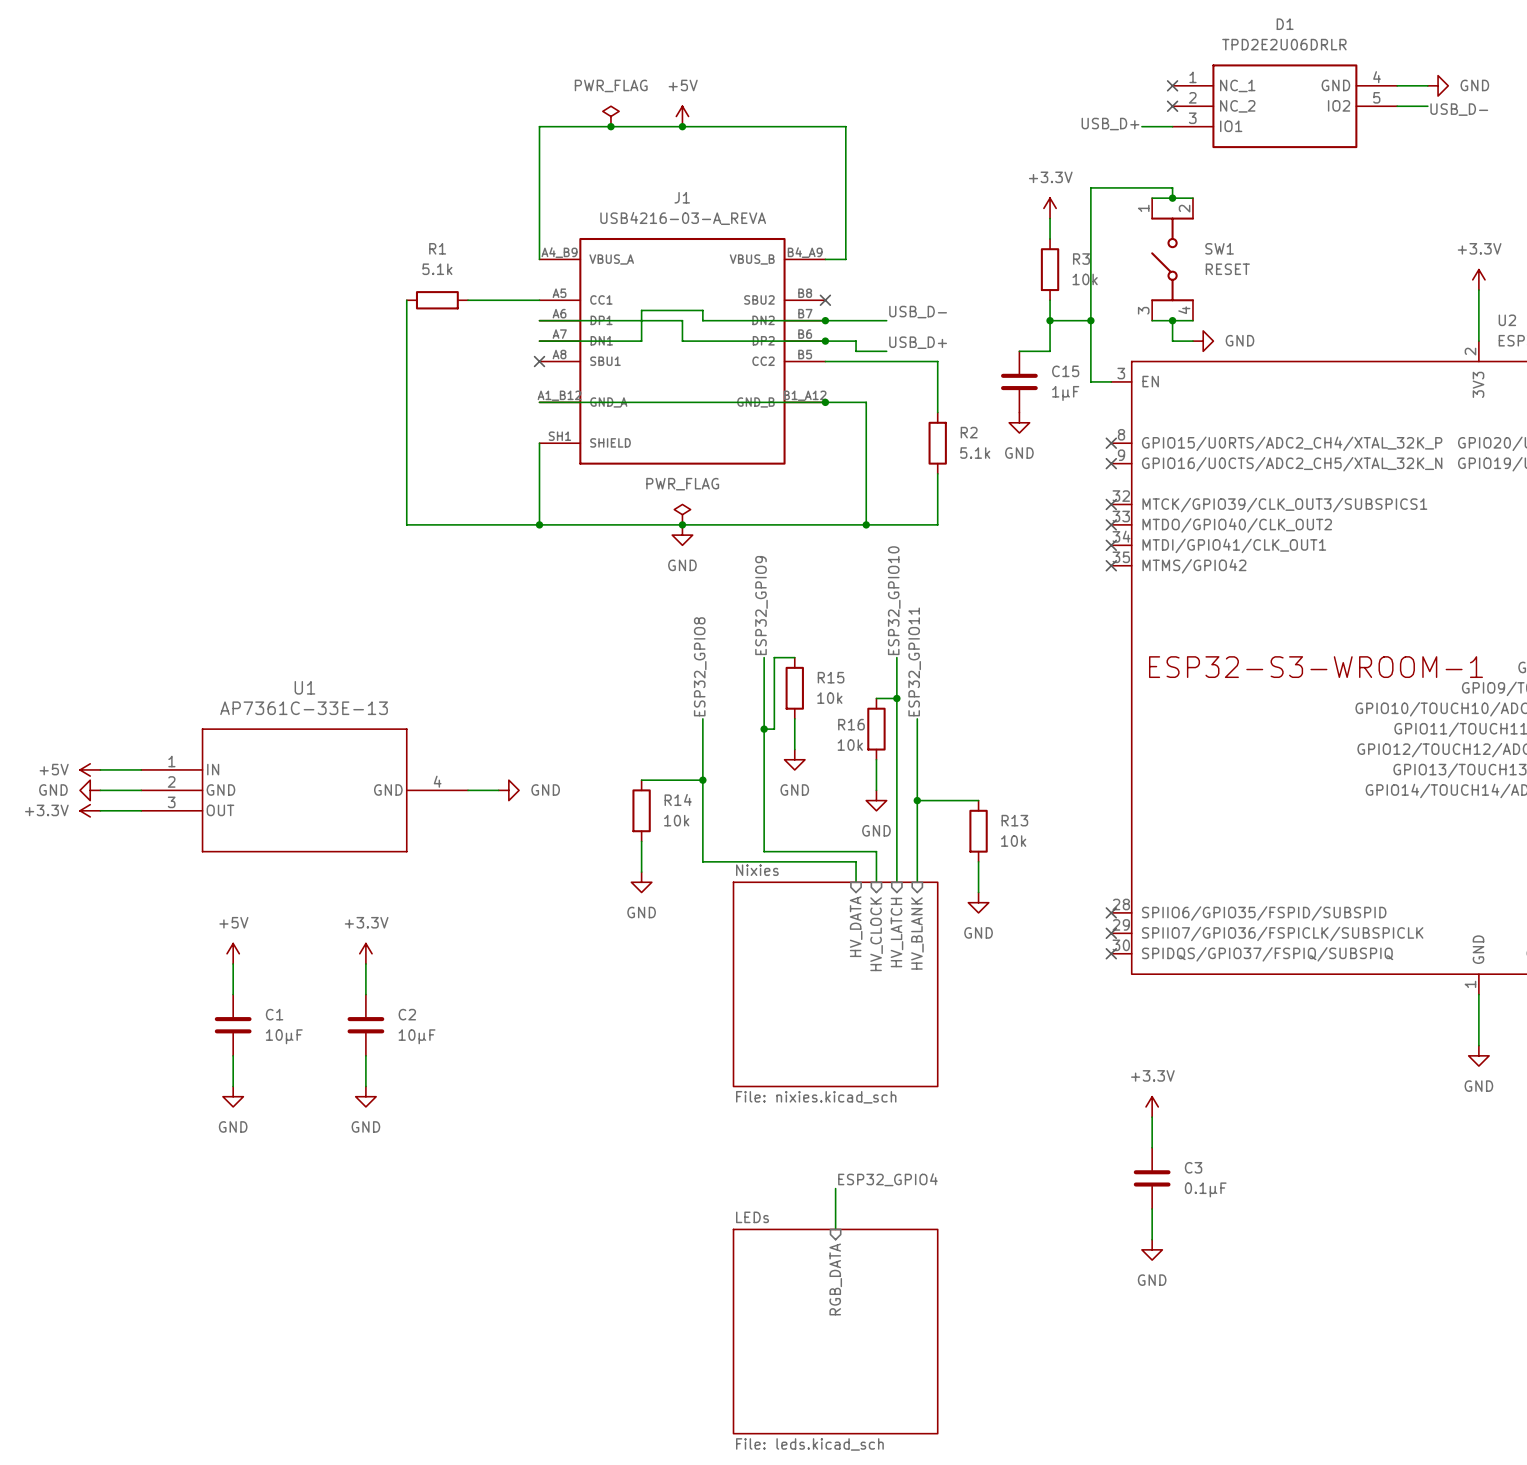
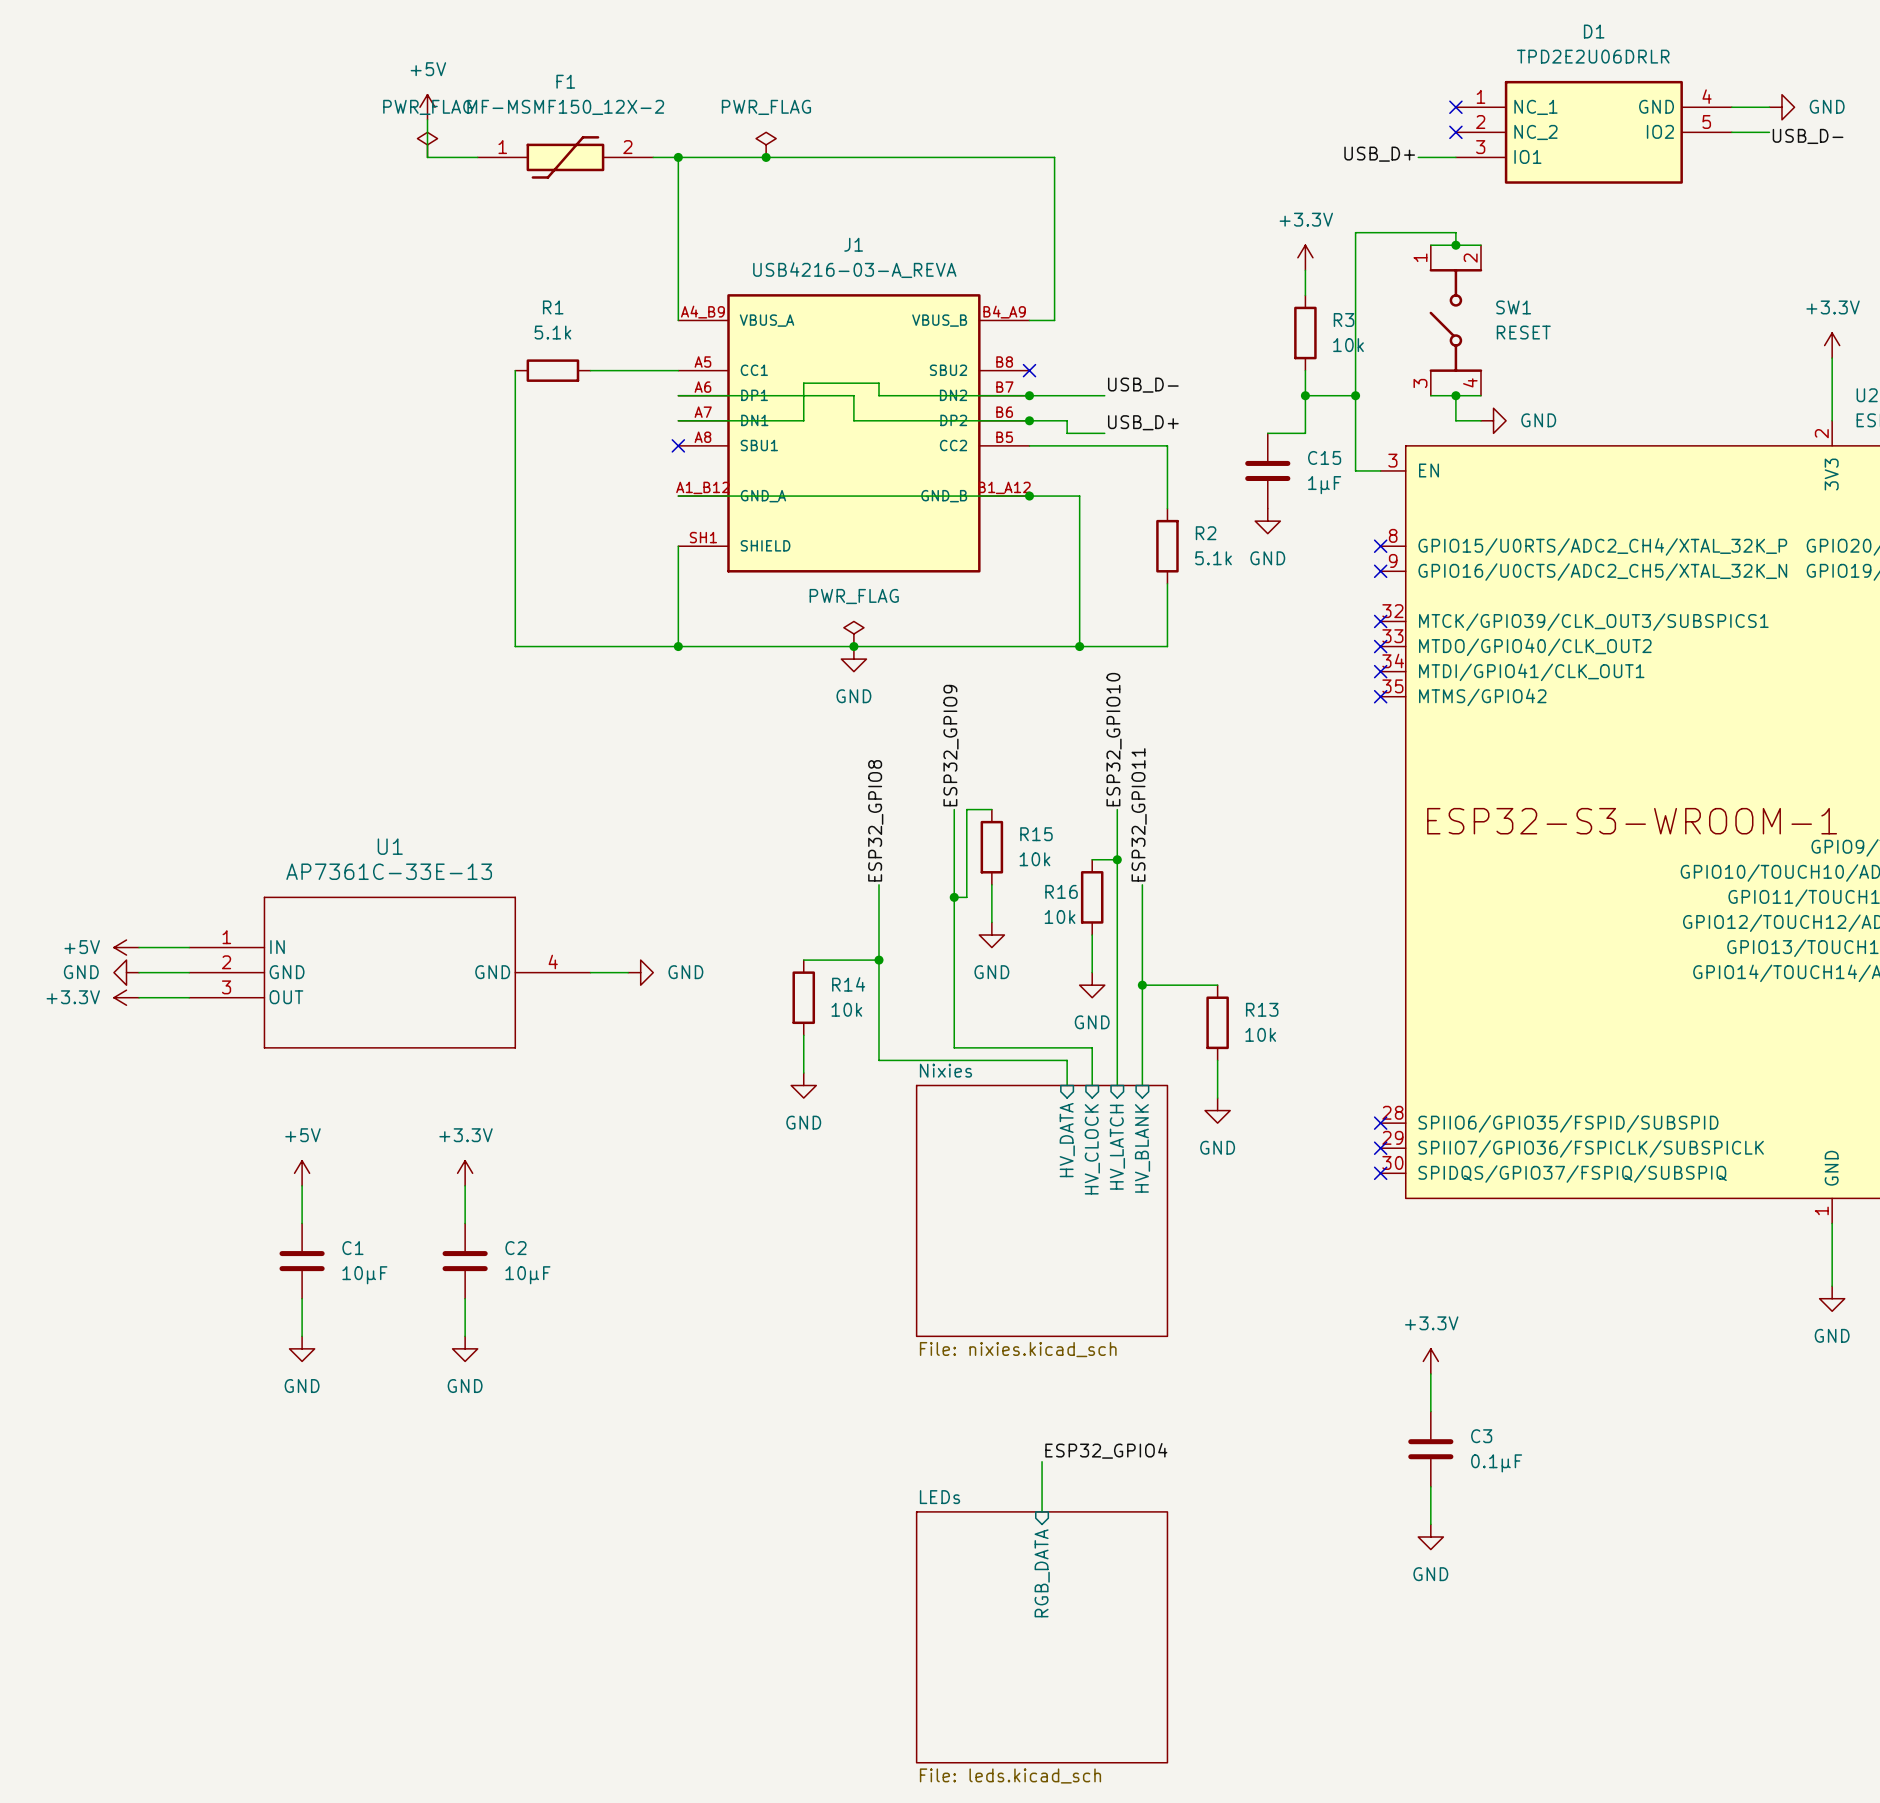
power symbol: none -> +5V (427, 107)
wire: none -> (427, 119) (427, 157) (477, 157)
power symbol: none -> PWR_FLAG (427, 144)
power symbol: +5V (682, 116) -> none
F1: none -> MF-MSMF150_12X-2 (565, 157)
wire: none -> (653, 157) (678, 157)
junction: none -> (678, 157)
junction: (682, 126) -> none

